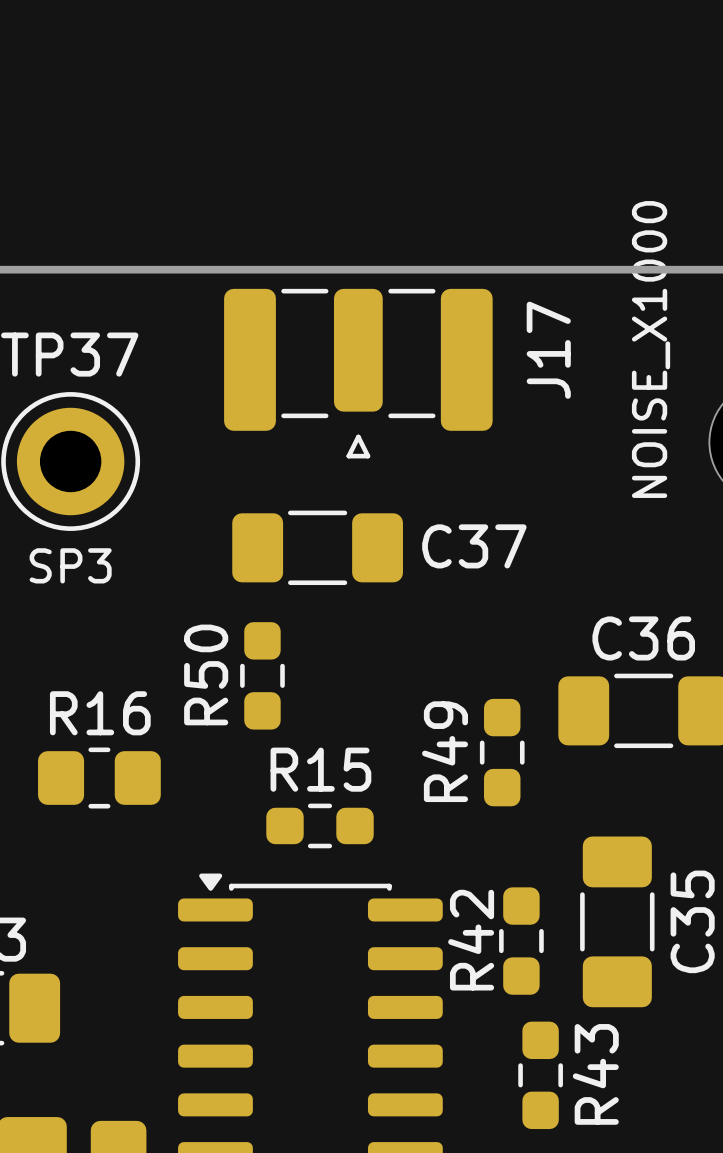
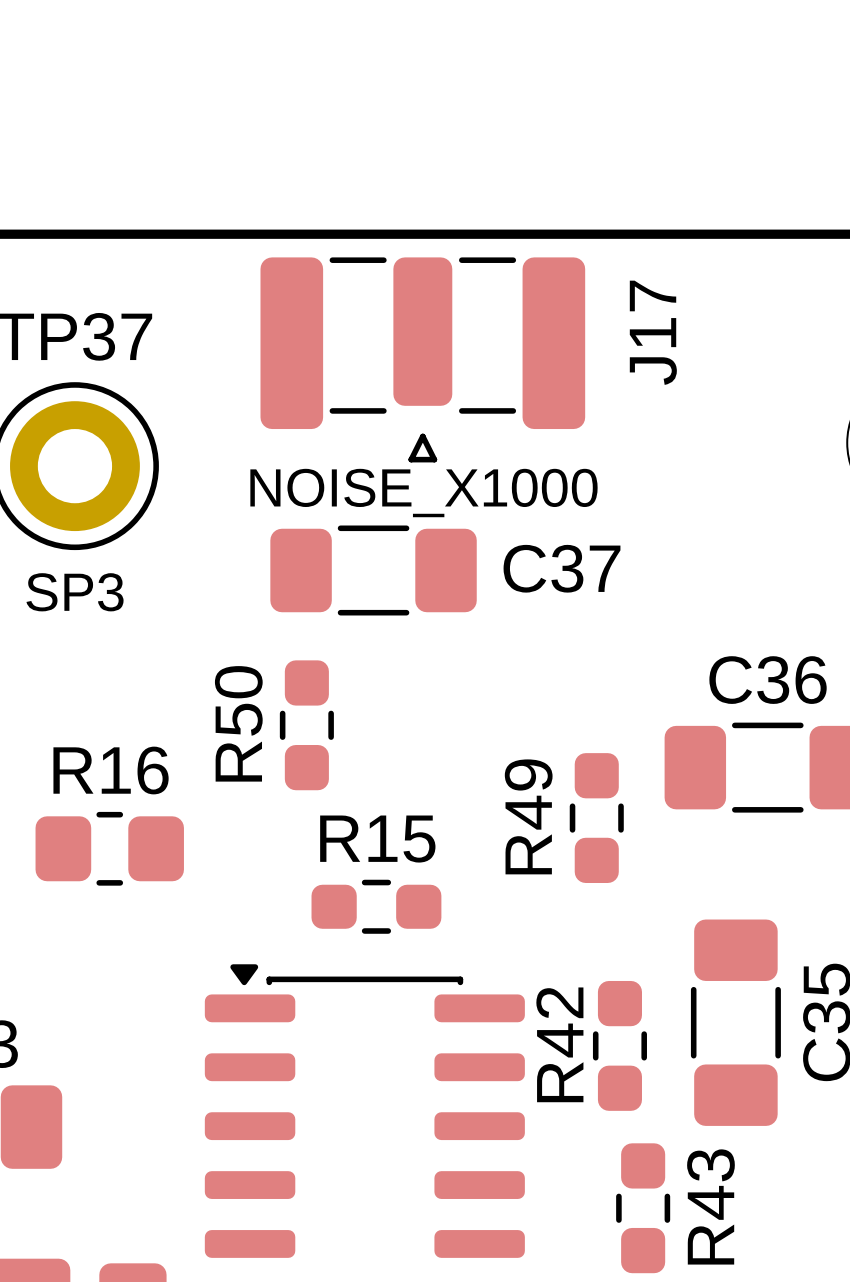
J17 value rotation: 0° (651, 349) -> 90° clockwise (423, 493)

